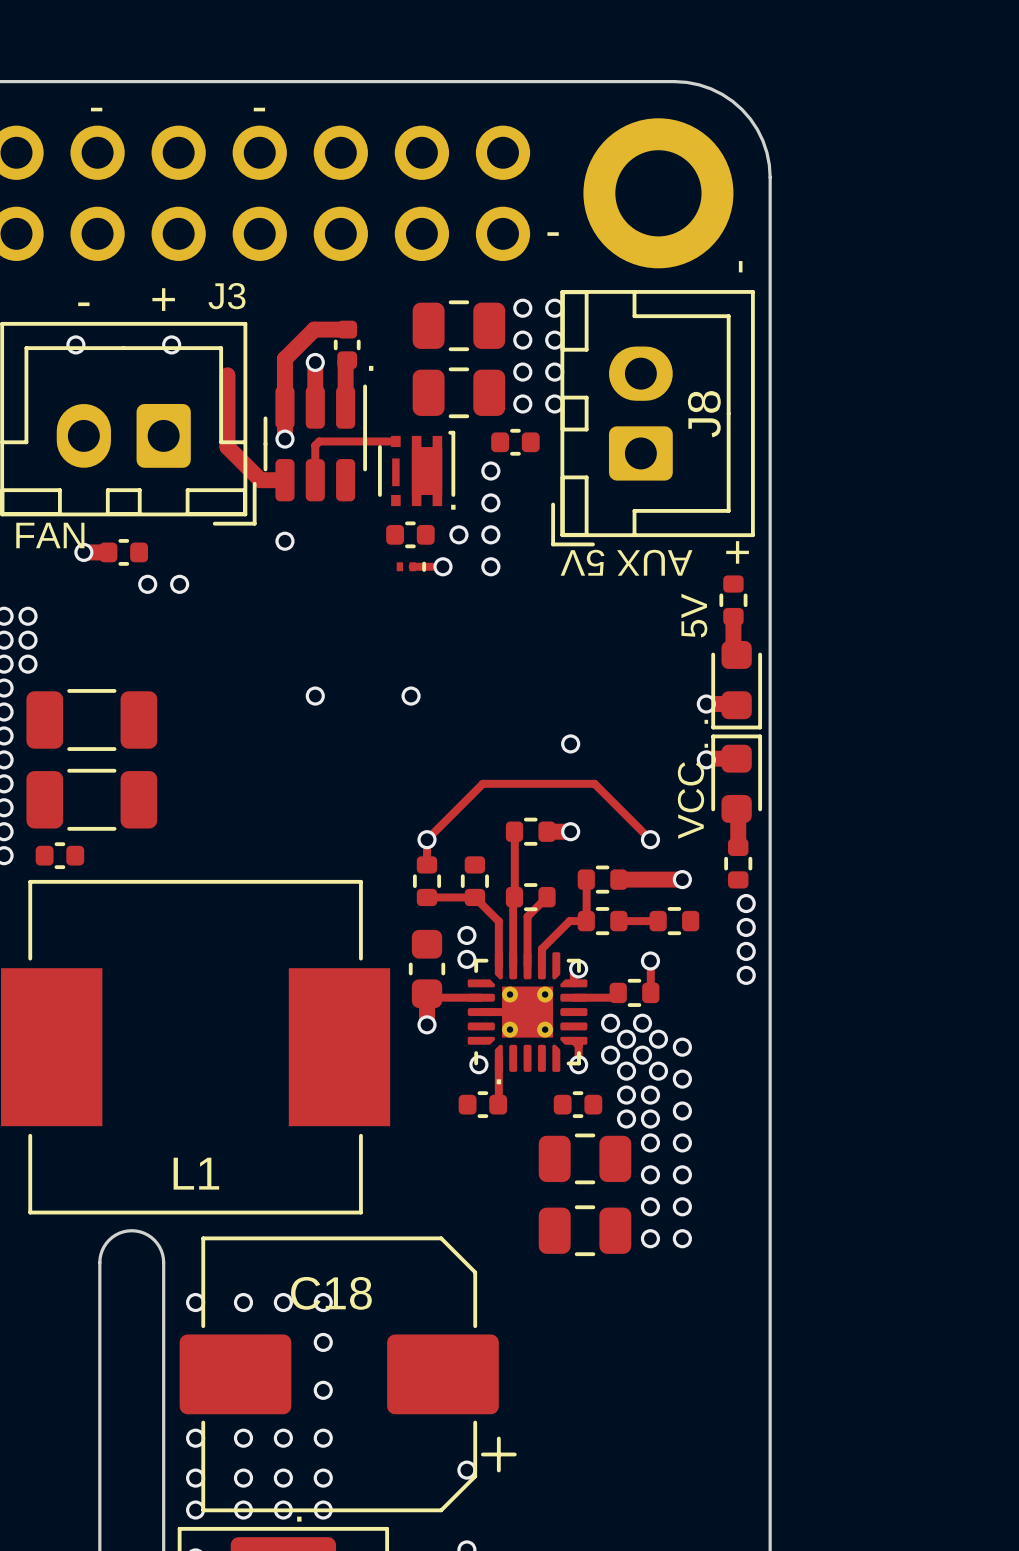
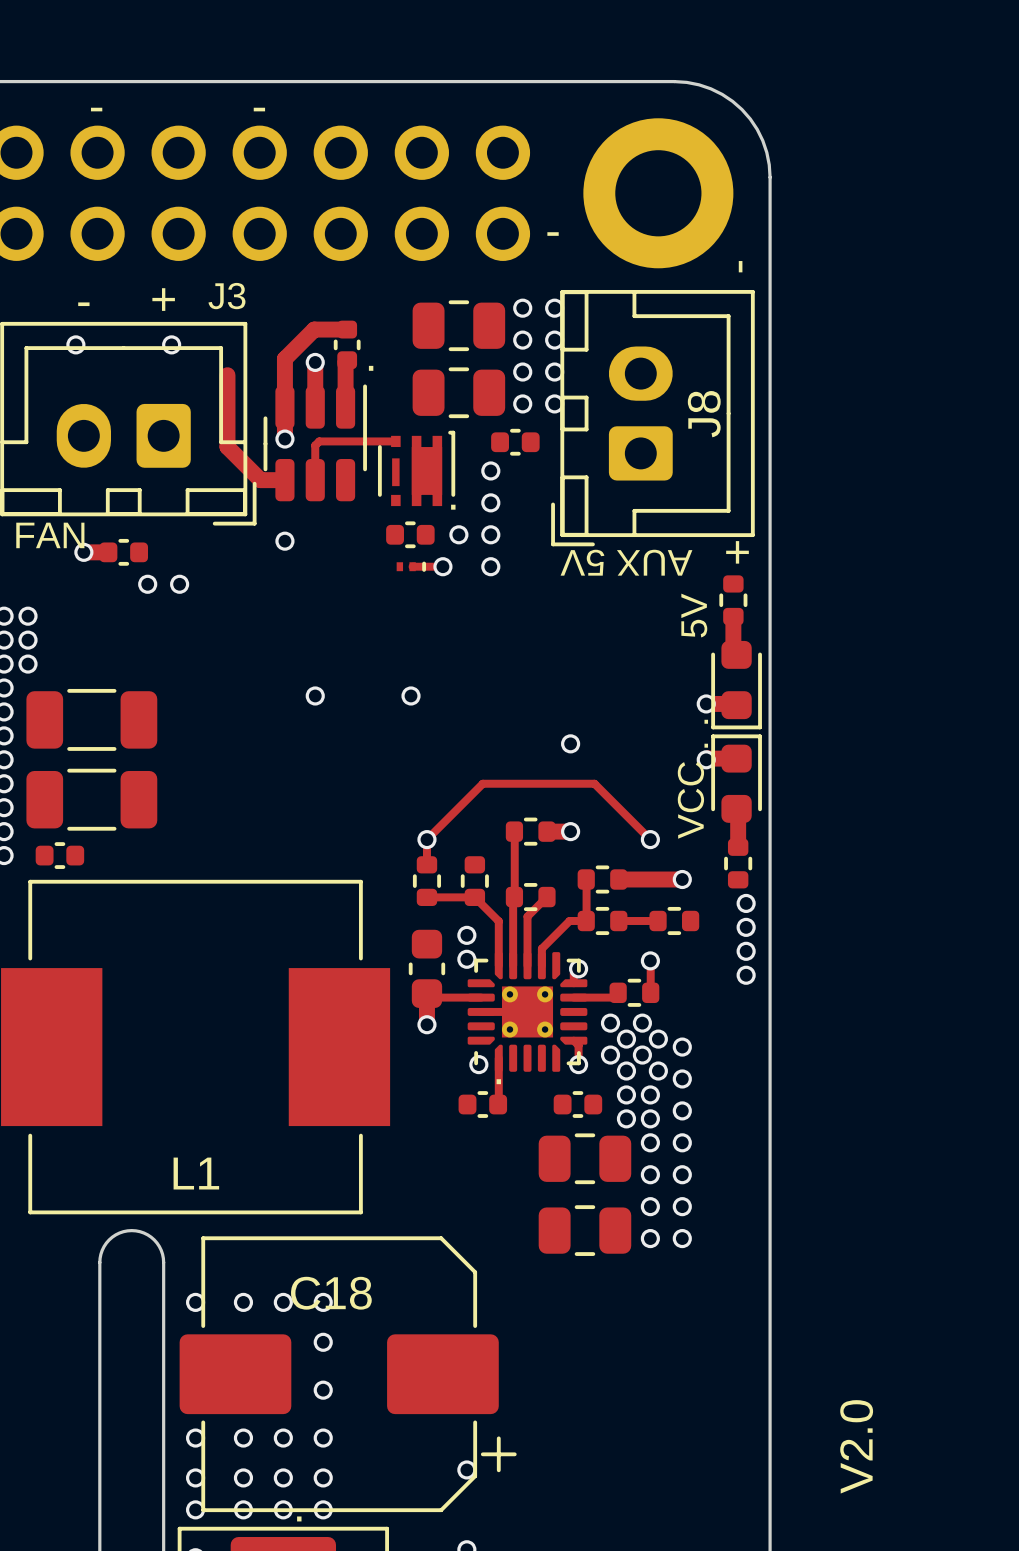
text: none -> V2.0 (856, 1446)

